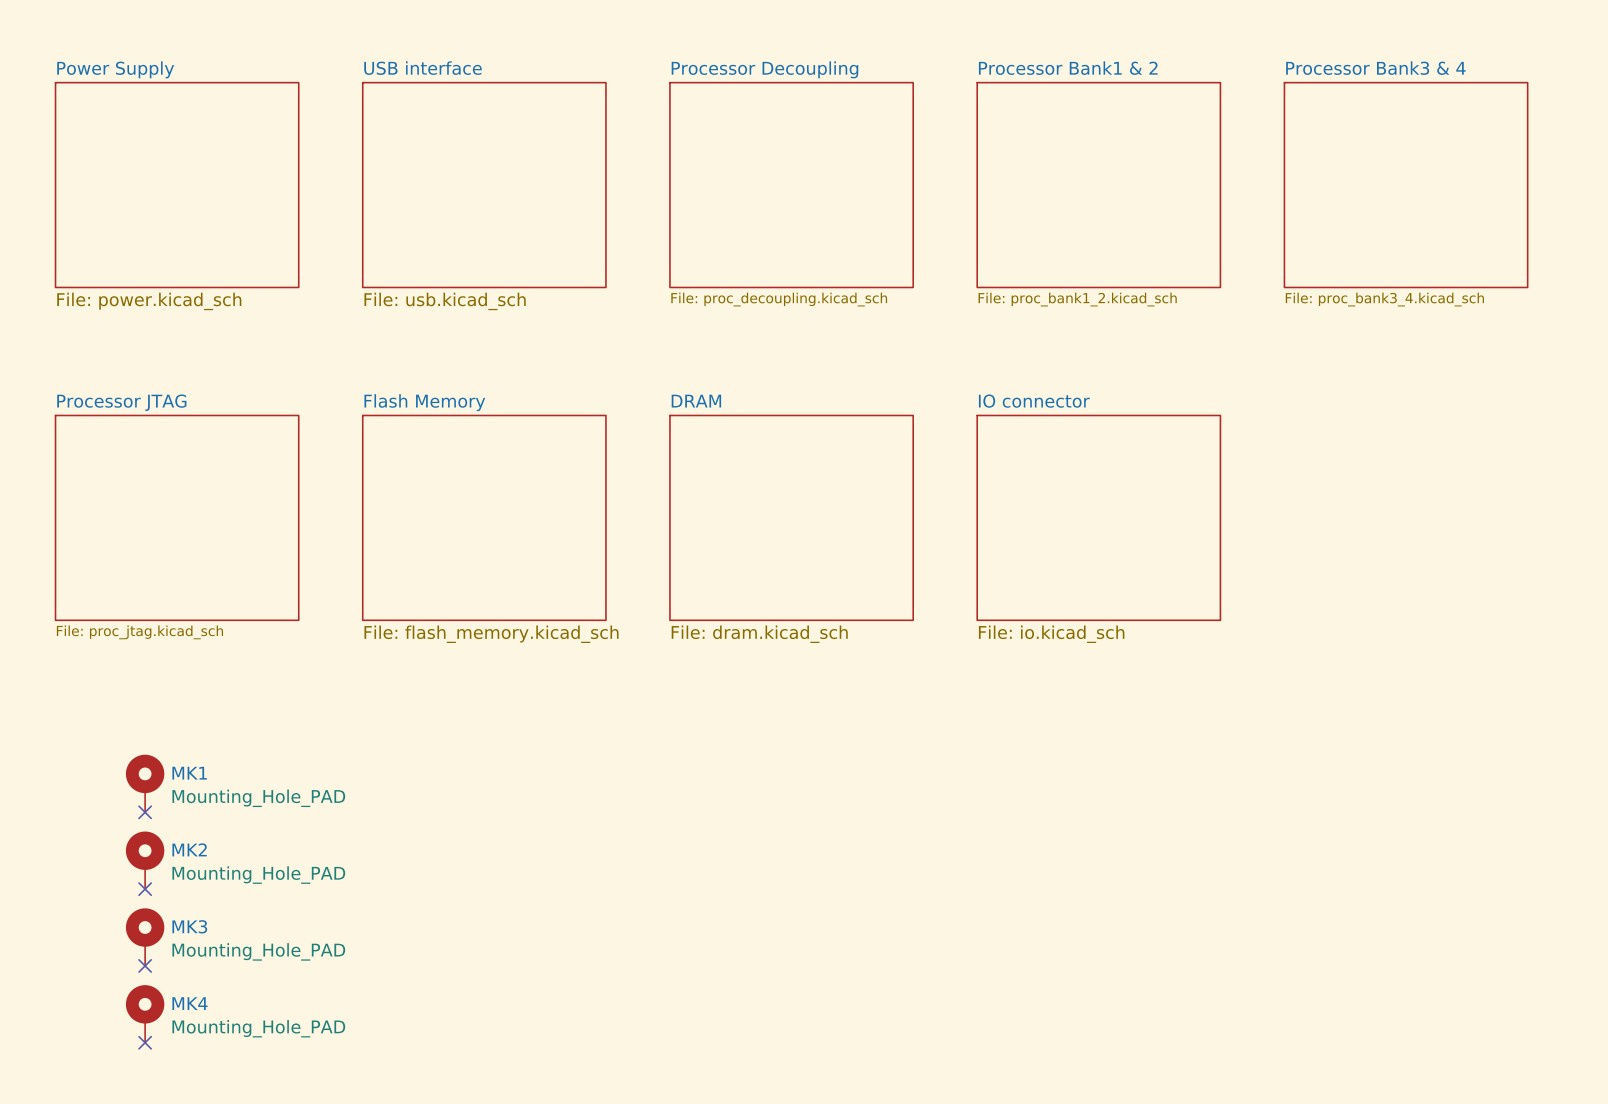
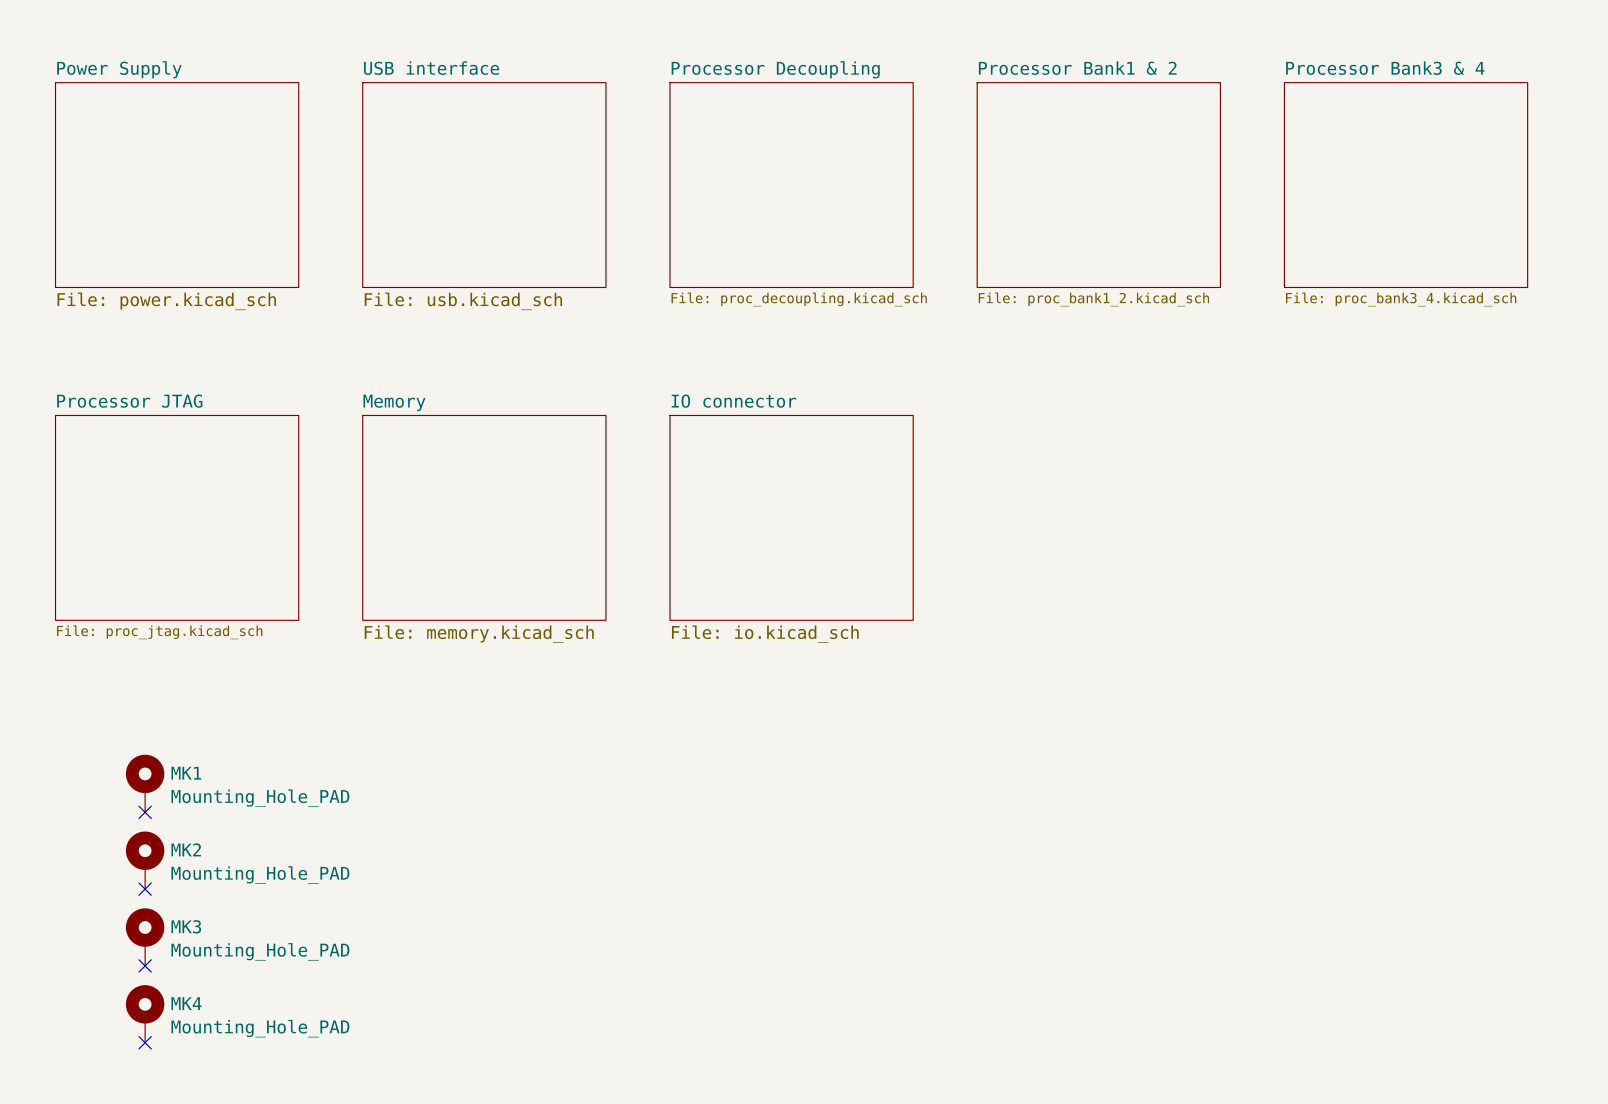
sheet DRAM name: DRAM (696, 401) -> IO connector (733, 401)
sheet Flash Memory name: Flash Memory (424, 402) -> Memory (394, 402)
sheet IO connector: File: io.kicad_sch (1098, 517) -> none
sheet Flash Memory value: File: flash_memory.kicad_sch (491, 634) -> File: memory.kicad_sch (479, 634)
sheet DRAM value: File: dram.kicad_sch (759, 634) -> File: io.kicad_sch (765, 634)

